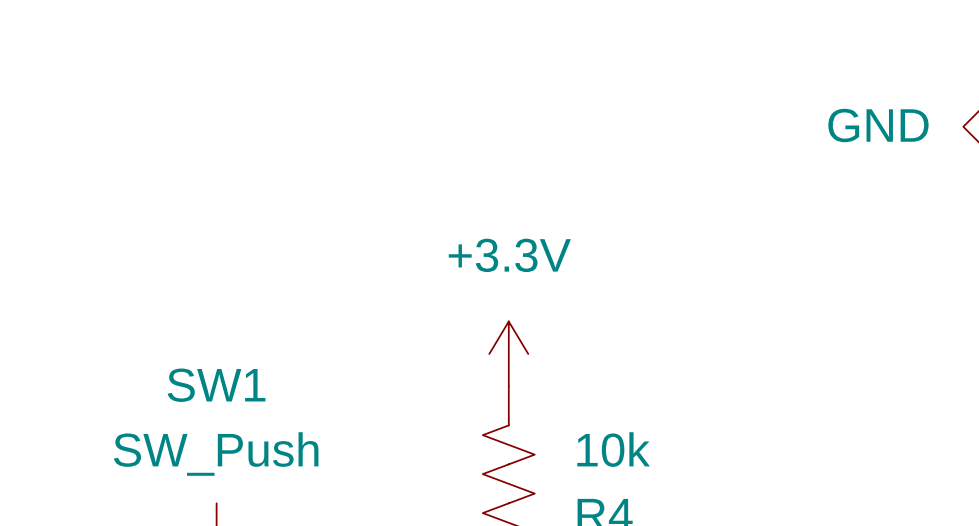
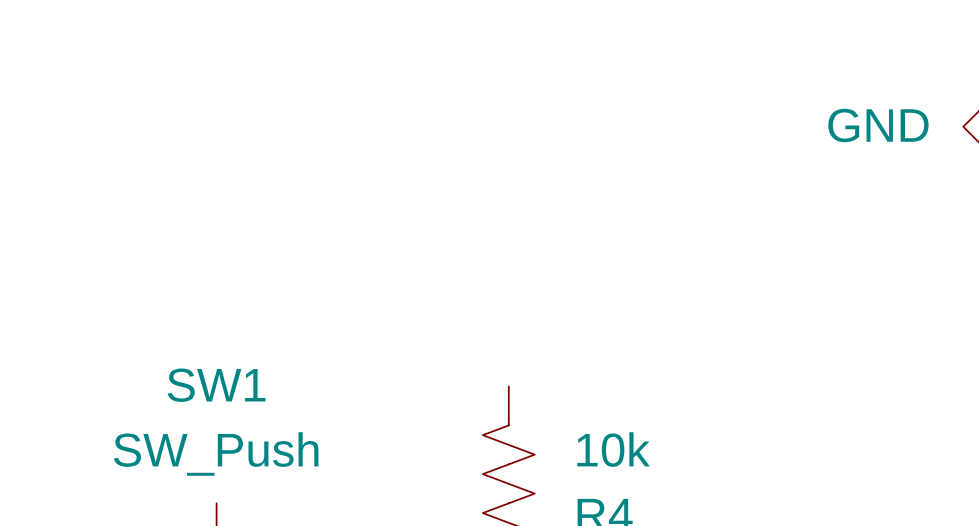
power symbol: +3.3V (508, 353) -> none

